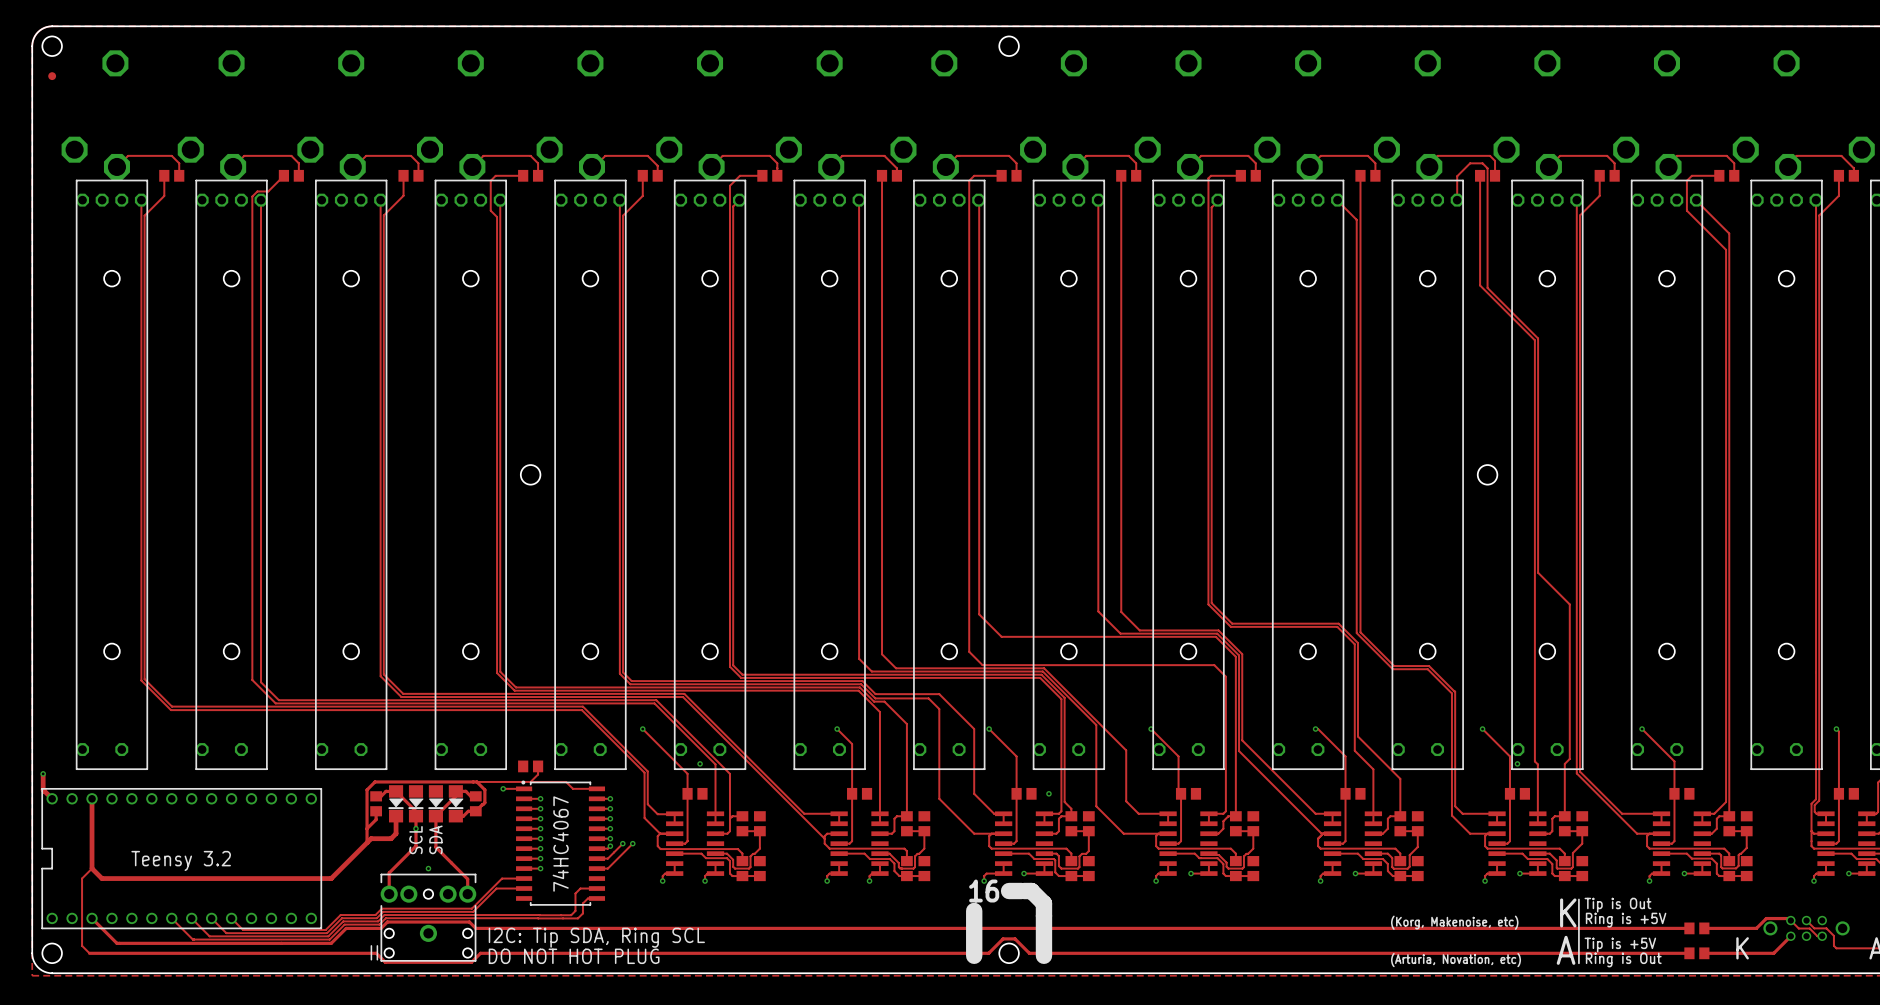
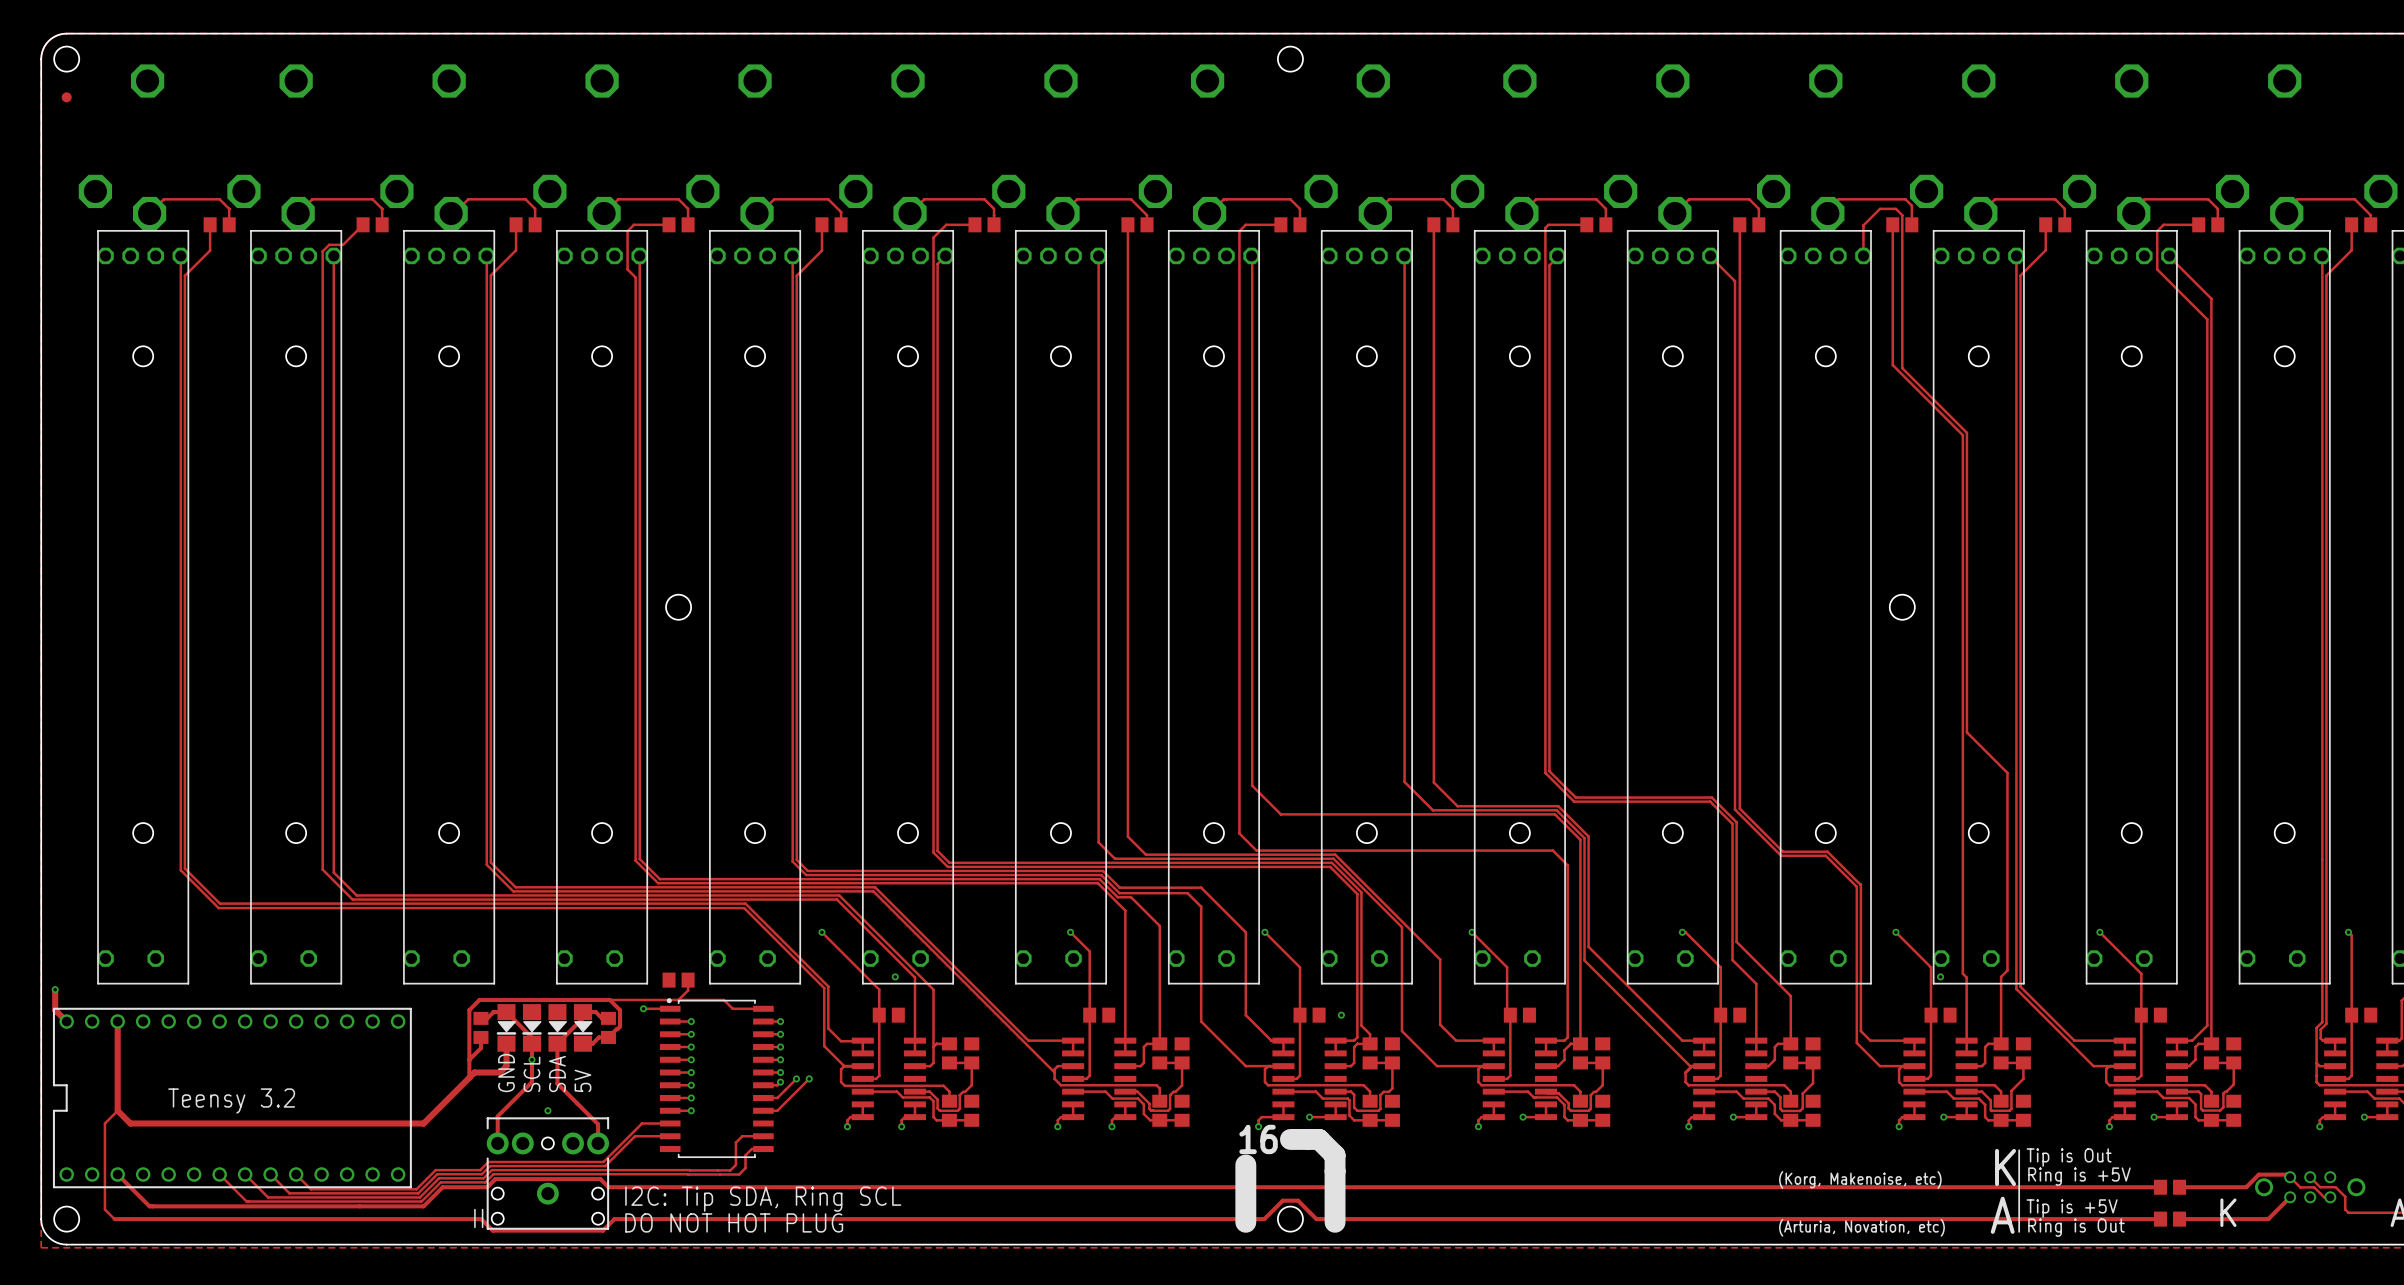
text: none -> GND (506, 1073)
text: 74HC4067 (560, 844) -> none
text: none -> 5V (582, 1080)

